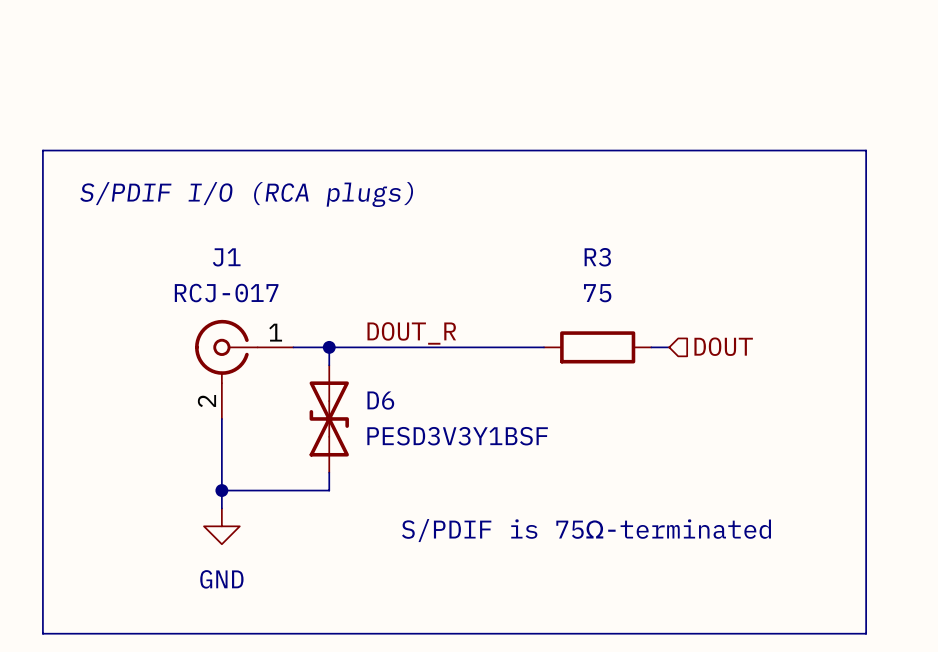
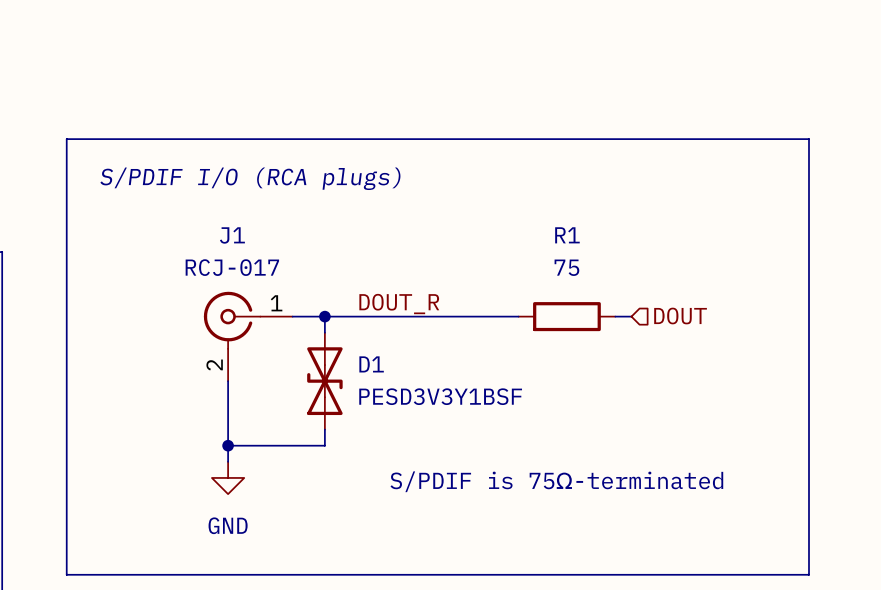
R3 name: R3 (597, 257) -> R1 (567, 235)
D6 name: D6 (380, 400) -> D1 (371, 364)

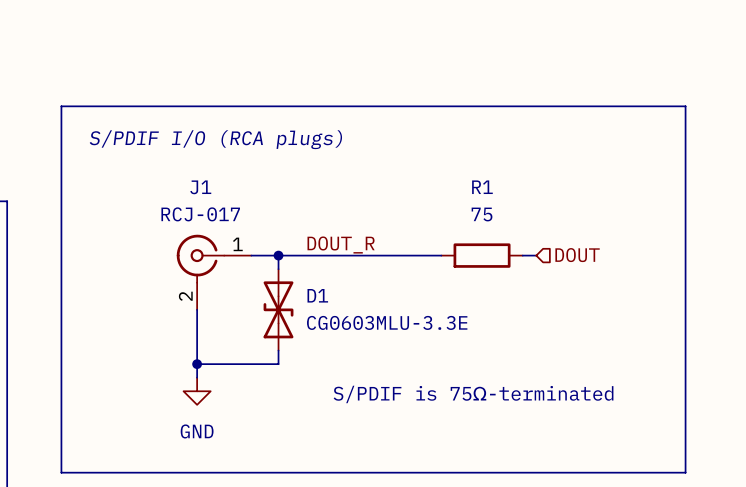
D1 value: PESD3V3Y1BSF (440, 396) -> CG0603MLU-3.3E (387, 322)

